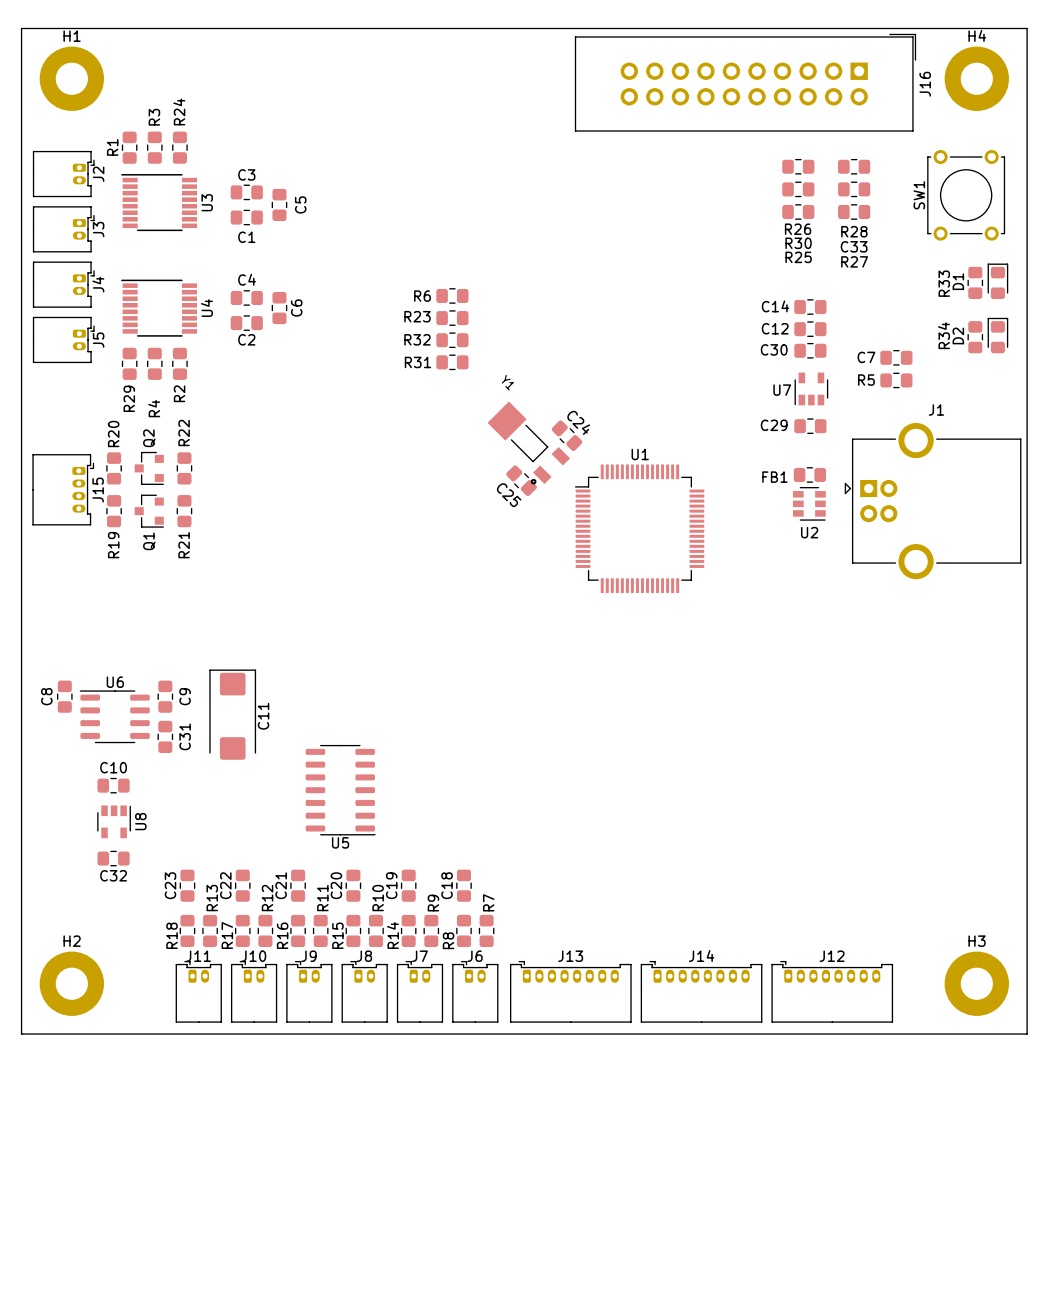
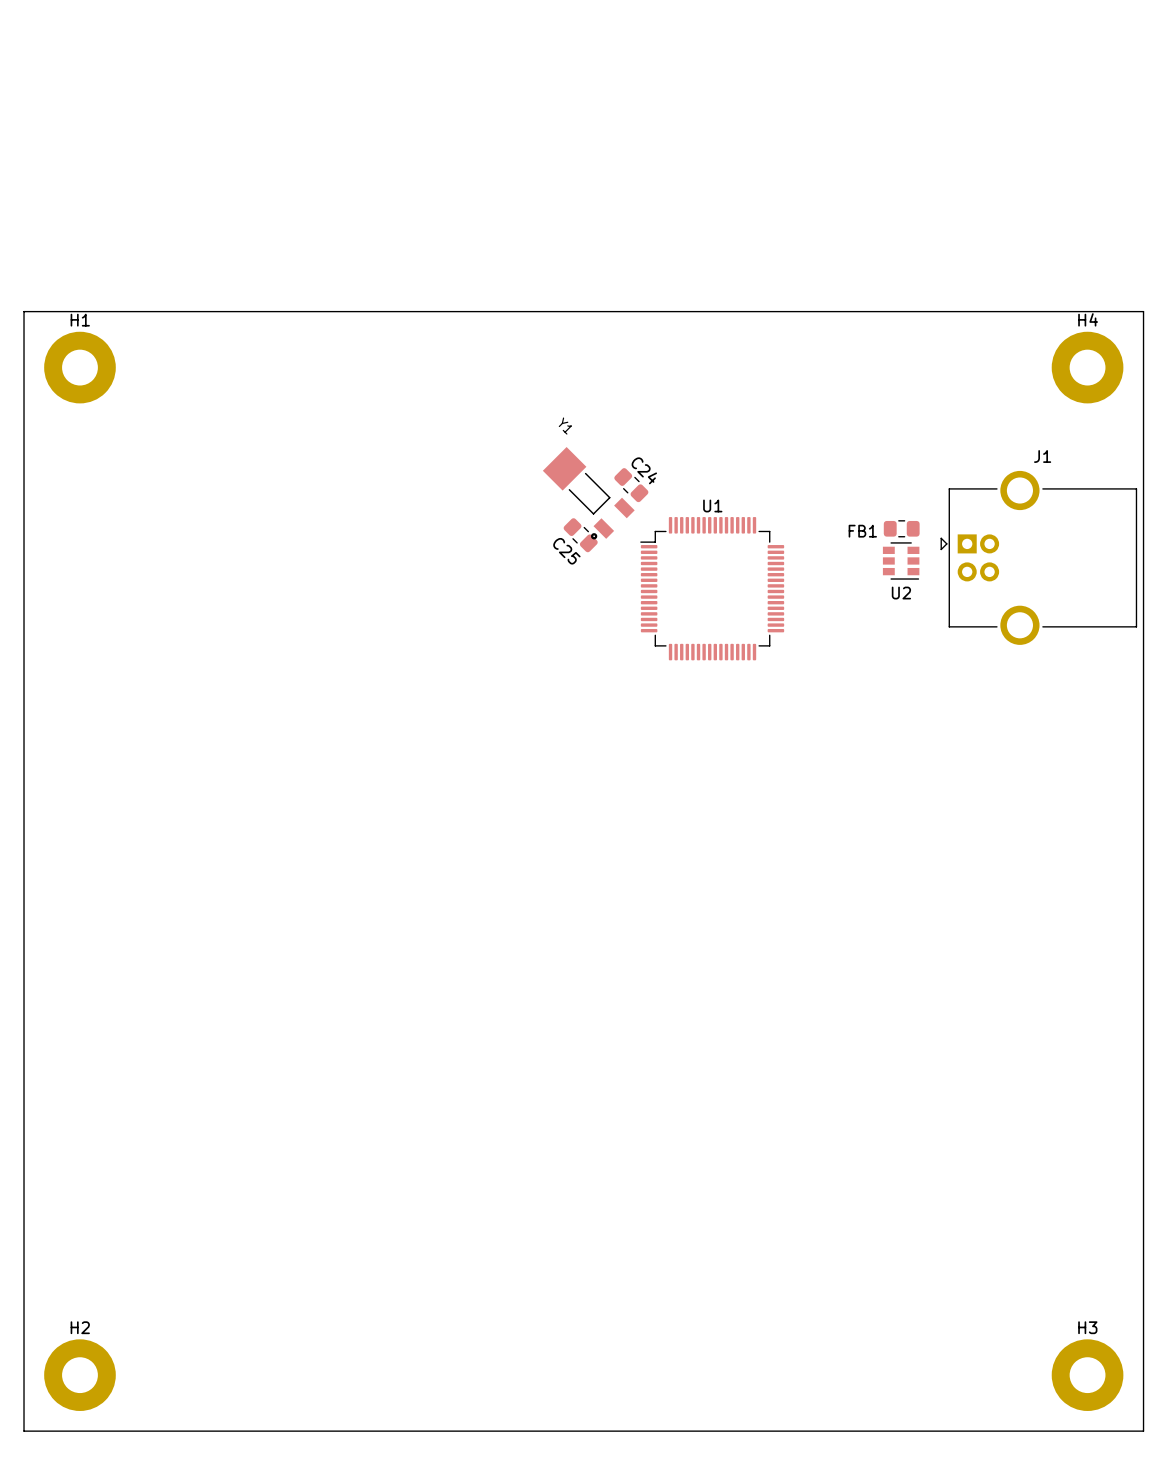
H1 position: (71, 78) -> (79, 367)
H4 position: (976, 78) -> (1087, 367)
J16: (745, 82) -> none
R1: (129, 147) -> none
R3: (154, 147) -> none
R24: (179, 147) -> none
R26: (798, 166) -> none
R28: (854, 166) -> none
J2: (63, 174) -> none
R30: (798, 189) -> none
C33: (854, 189) -> none
C3: (246, 192) -> none
SW1: (966, 195) -> none
U3: (159, 202) -> none
C5: (279, 204) -> none
R25: (798, 212) -> none
R27: (854, 212) -> none
C1: (246, 217) -> none
J3: (63, 229) -> none
board edge: (21, 279) (21, 28) (1027, 28) (1027, 279) -> (24, 311) (1143, 311)
D1: (997, 281) -> none
R33: (975, 282) -> none
J4: (63, 284) -> none
R6: (452, 295) -> none
C4: (246, 297) -> none
C14: (810, 307) -> none
U4: (159, 308) -> none
C6: (279, 308) -> none
R23: (452, 318) -> none
C2: (246, 323) -> none
C12: (810, 329) -> none
D2: (997, 335) -> none
R34: (975, 337) -> none
J5: (63, 339) -> none
R32: (452, 340) -> none
C30: (810, 350) -> none
C7: (896, 357) -> none
R31: (452, 362) -> none
R29: (129, 363) -> none
R4: (154, 363) -> none
R2: (179, 363) -> none
R5: (896, 380) -> none
U7: (811, 388) -> none
C29: (810, 426) -> none
R20: (114, 468) -> none
Q2: (149, 468) -> none
R22: (184, 468) -> none
J15: (63, 489) -> none
R19: (114, 511) -> none
Q1: (149, 511) -> none
R21: (184, 511) -> none
C8: (64, 696) -> none
C9: (165, 696) -> none
C11: (232, 714) -> none
U6: (114, 716) -> none
C31: (165, 736) -> none
C10: (113, 785) -> none
U5: (340, 790) -> none
U8: (114, 821) -> none
C32: (113, 858) -> none
C23: (187, 885) -> none
C22: (242, 885) -> none
C21: (298, 885) -> none
C20: (353, 885) -> none
C19: (408, 885) -> none
C18: (463, 885) -> none
R18: (187, 930) -> none
R13: (210, 930) -> none
R17: (242, 930) -> none
R12: (265, 930) -> none
R16: (298, 930) -> none
R11: (320, 930) -> none
R15: (353, 930) -> none
R10: (376, 930) -> none
R14: (408, 930) -> none
R9: (431, 930) -> none
R8: (463, 930) -> none
R7: (486, 930) -> none
H2 position: (71, 983) -> (79, 1375)
H3 position: (976, 983) -> (1087, 1375)
J11: (198, 991) -> none
J10: (254, 991) -> none
J9: (309, 991) -> none
J8: (364, 991) -> none
J7: (420, 991) -> none
J6: (475, 991) -> none
J13: (570, 991) -> none
J14: (701, 991) -> none
J12: (832, 991) -> none
board edge: (21, 1034) (1027, 1034) -> (24, 1151) (24, 1431) (1143, 1431) (1143, 1151)

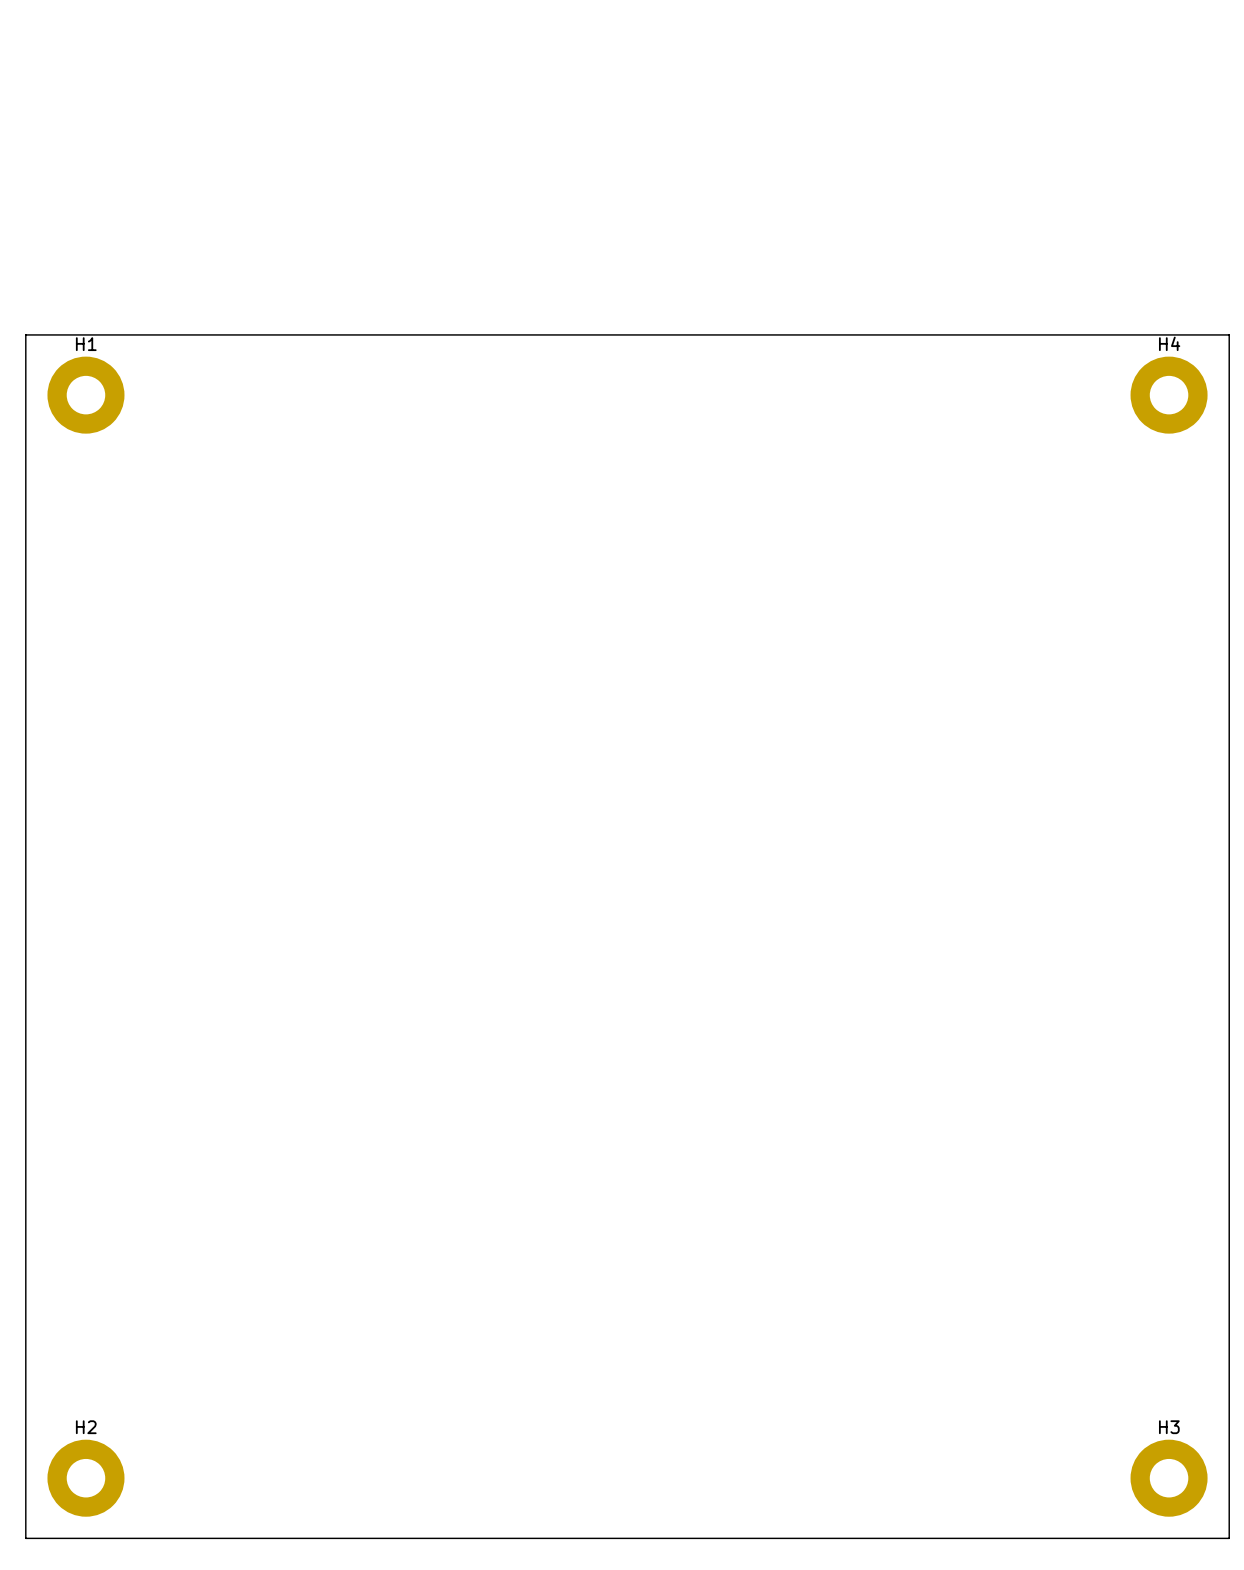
C24: (631, 485) -> none
Y1: (588, 493) -> none
FB1: (901, 528) -> none
C25: (580, 535) -> none
J1: (1038, 557) -> none
U2: (901, 560) -> none
U1: (712, 588) -> none

